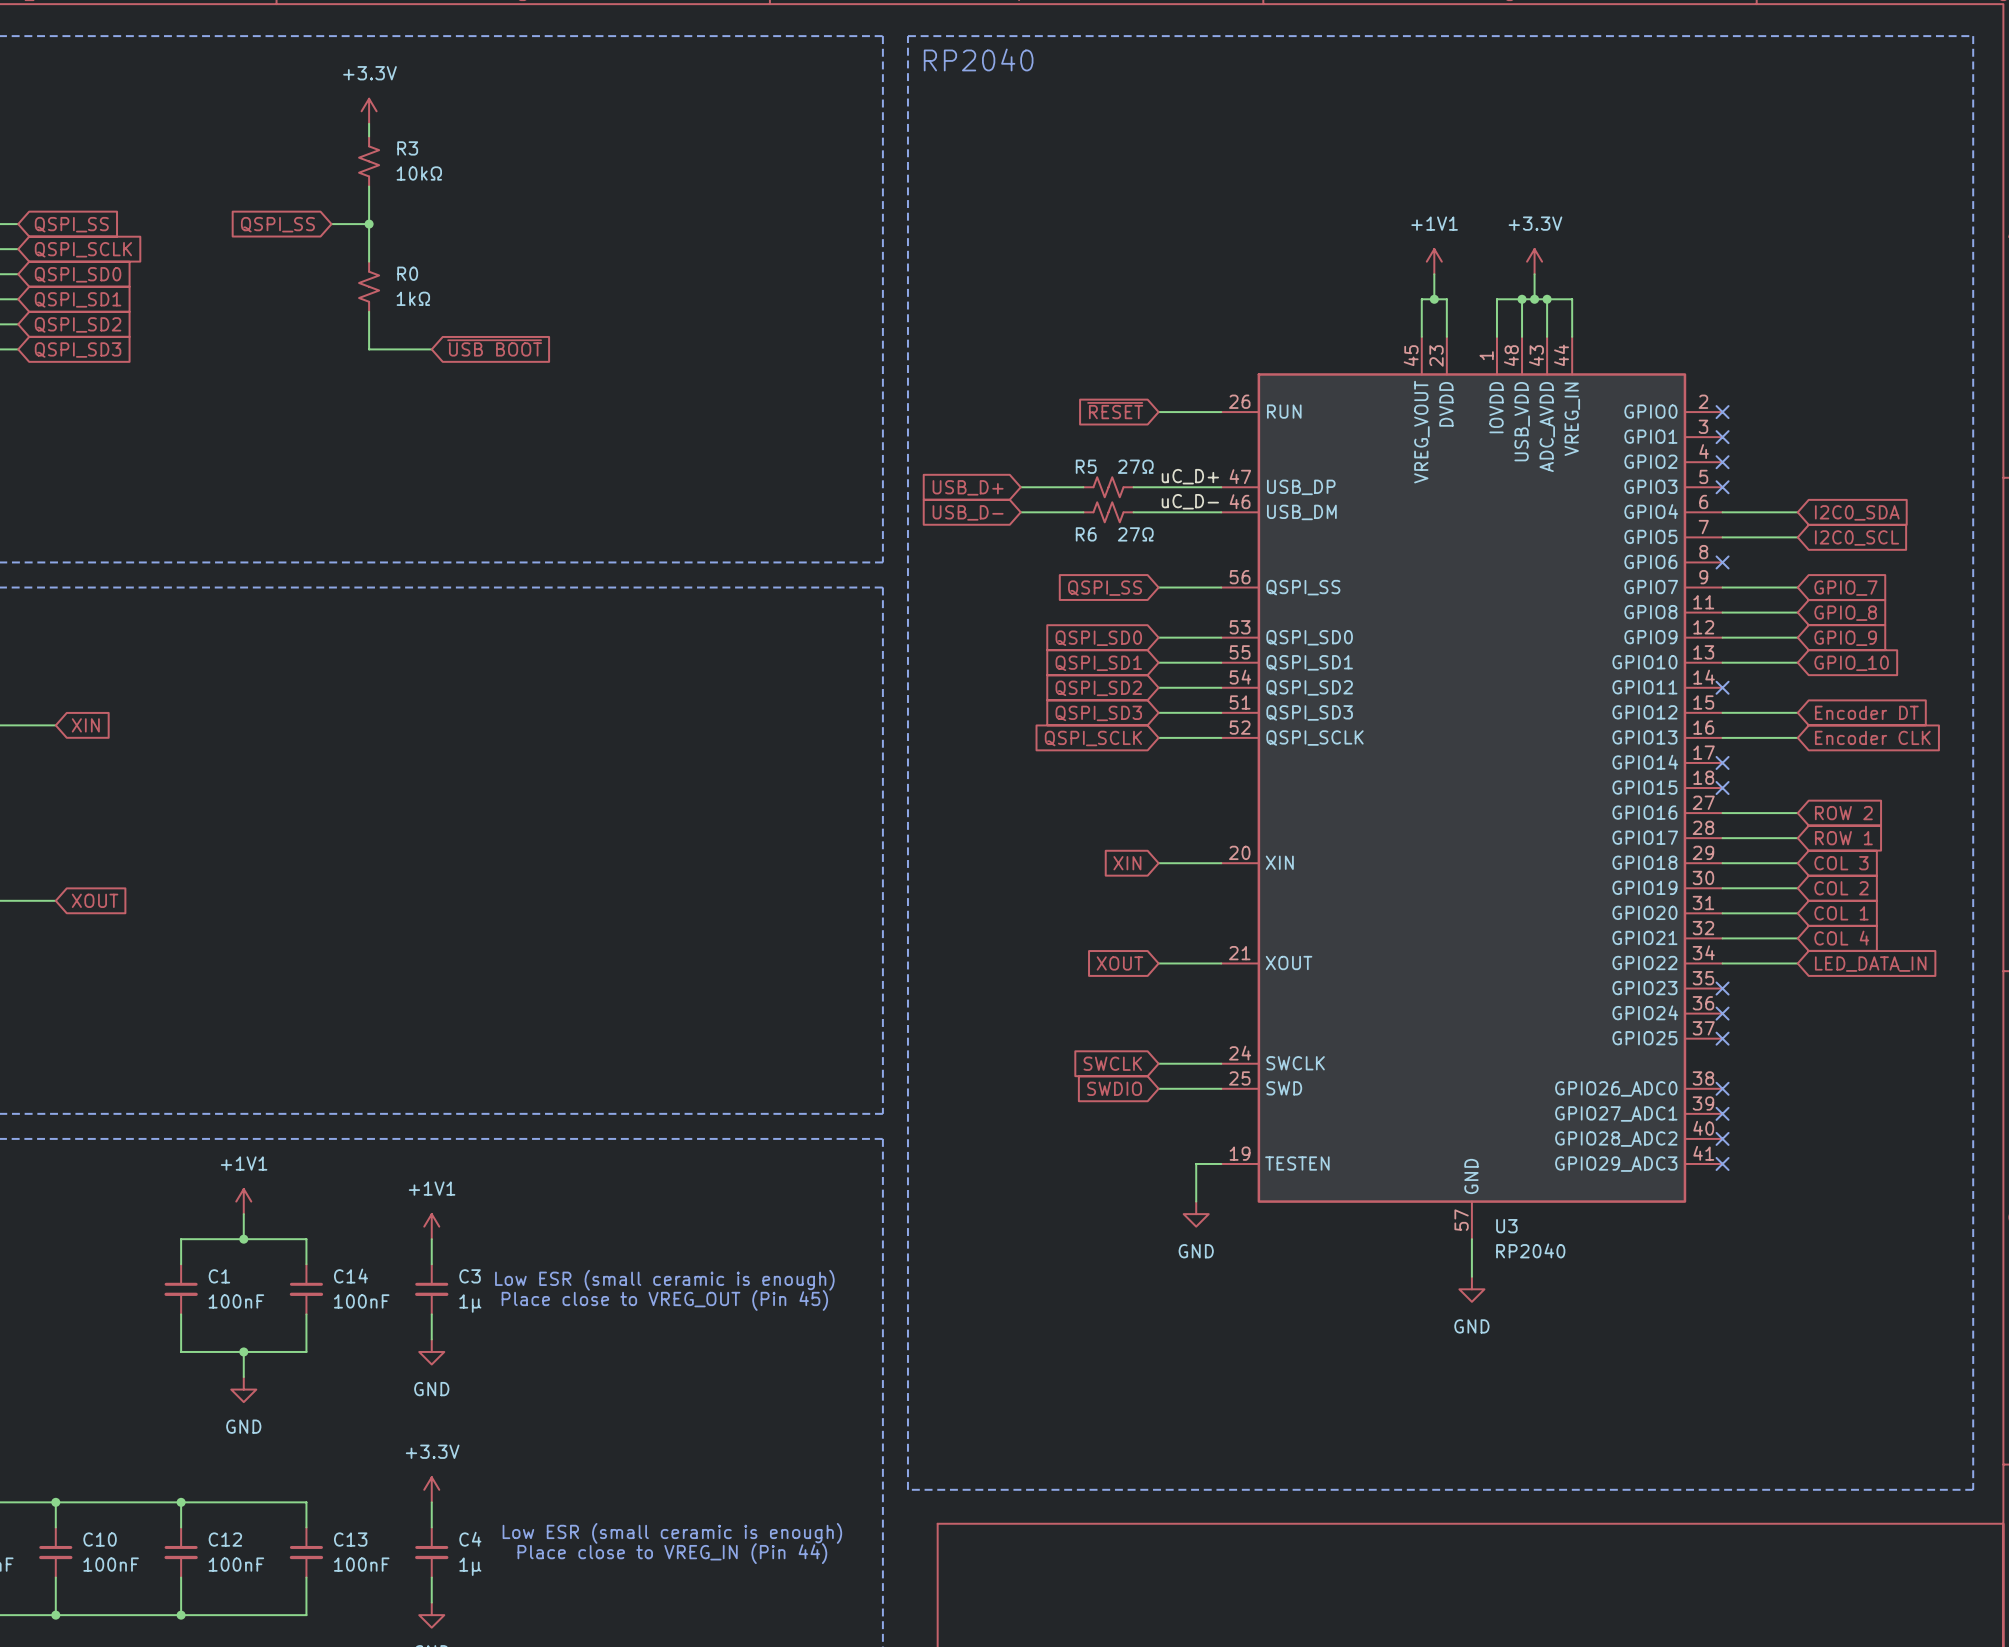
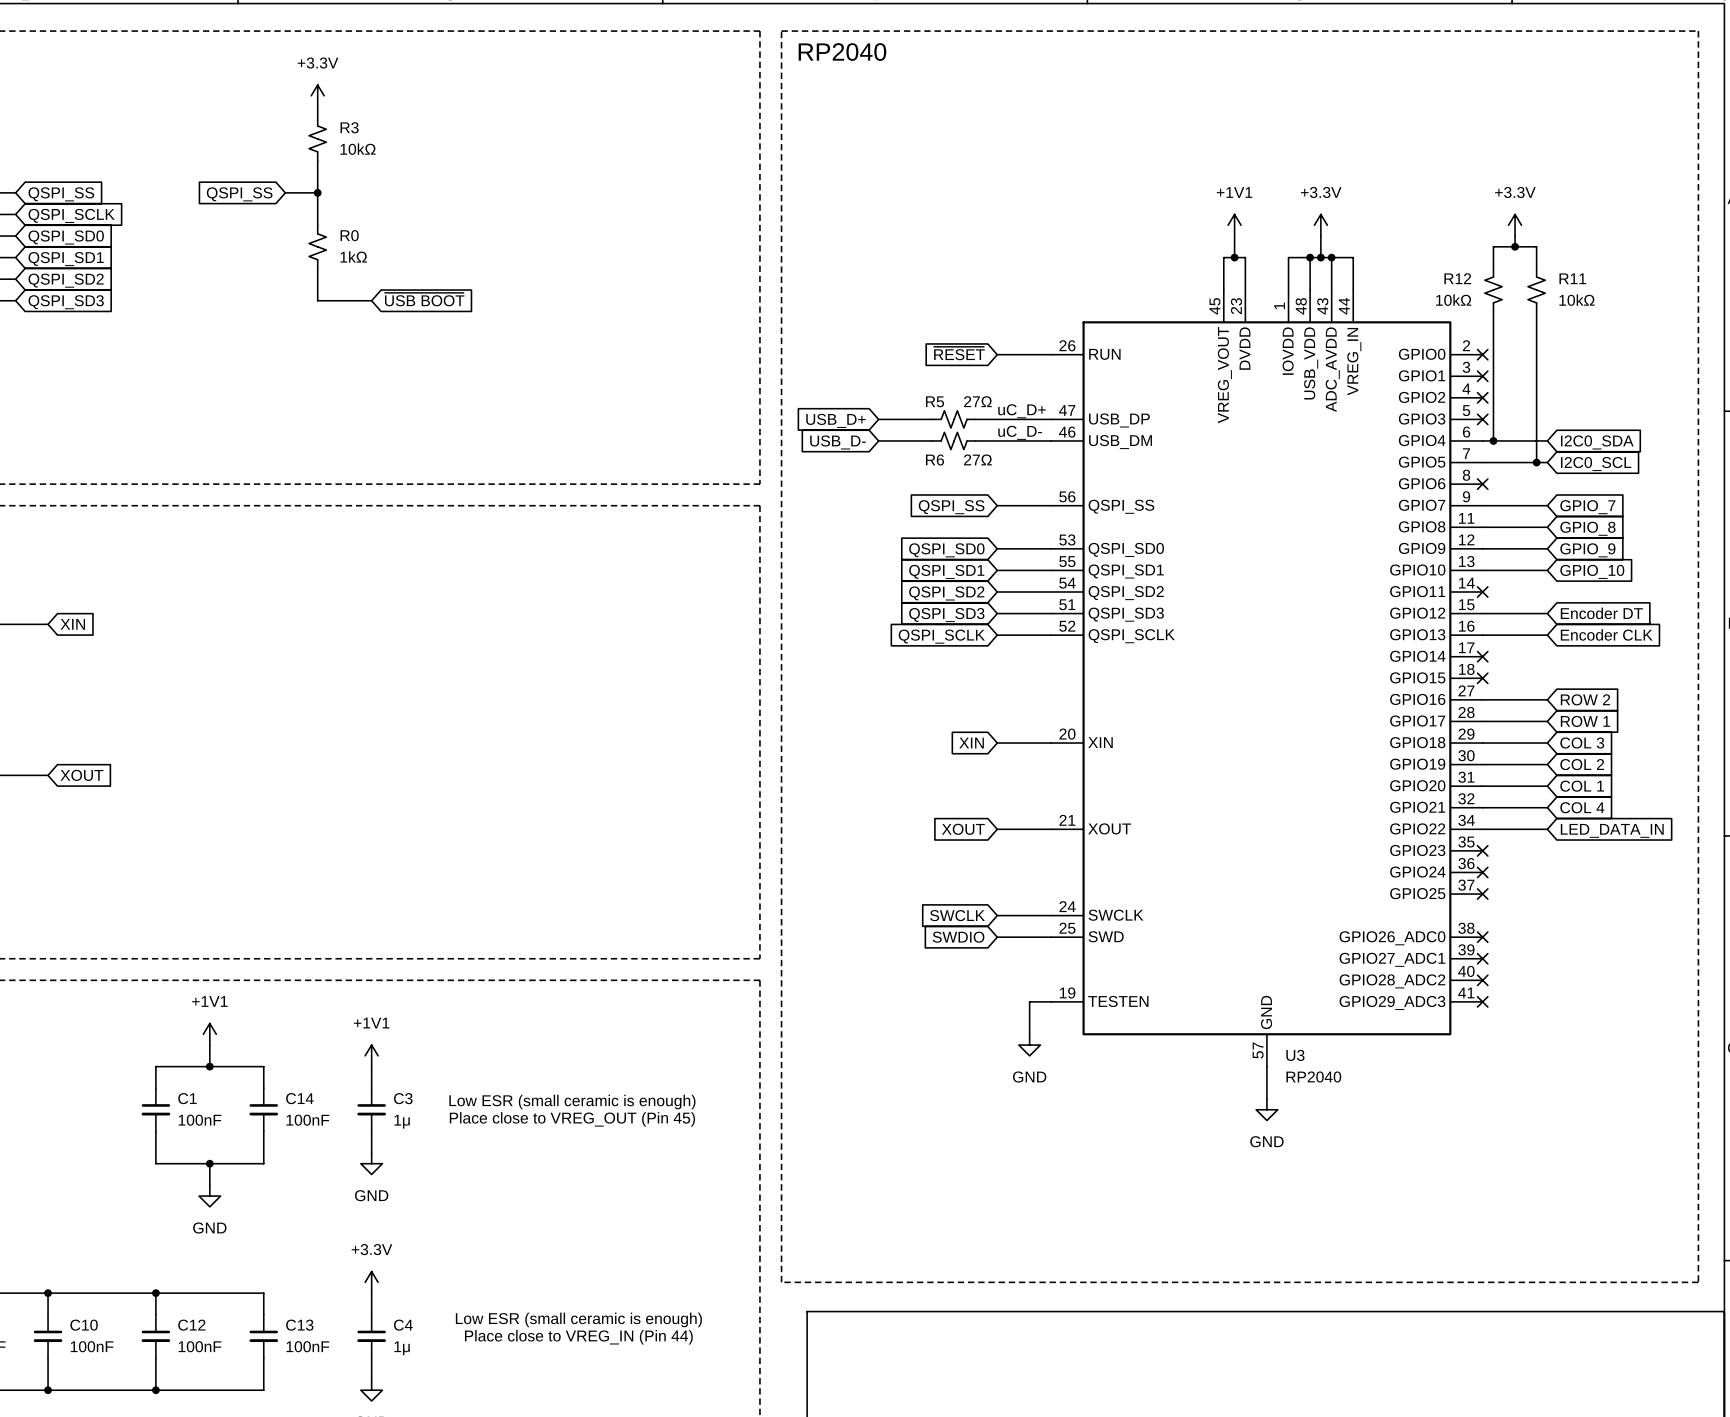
power symbol: none -> +3.3V (1515, 225)
wire: none -> (1515, 236) (1515, 246)
junction: none -> (1515, 246)
wire: none -> (1493, 268) (1493, 246) (1536, 246) (1536, 268)
R12: none -> 10kΩ (1493, 289)
R11: none -> 10kΩ (1536, 289)
wire: none -> (1493, 311) (1493, 440)
wire: none -> (1536, 311) (1536, 462)
junction: none -> (1493, 440)
junction: none -> (1536, 462)

